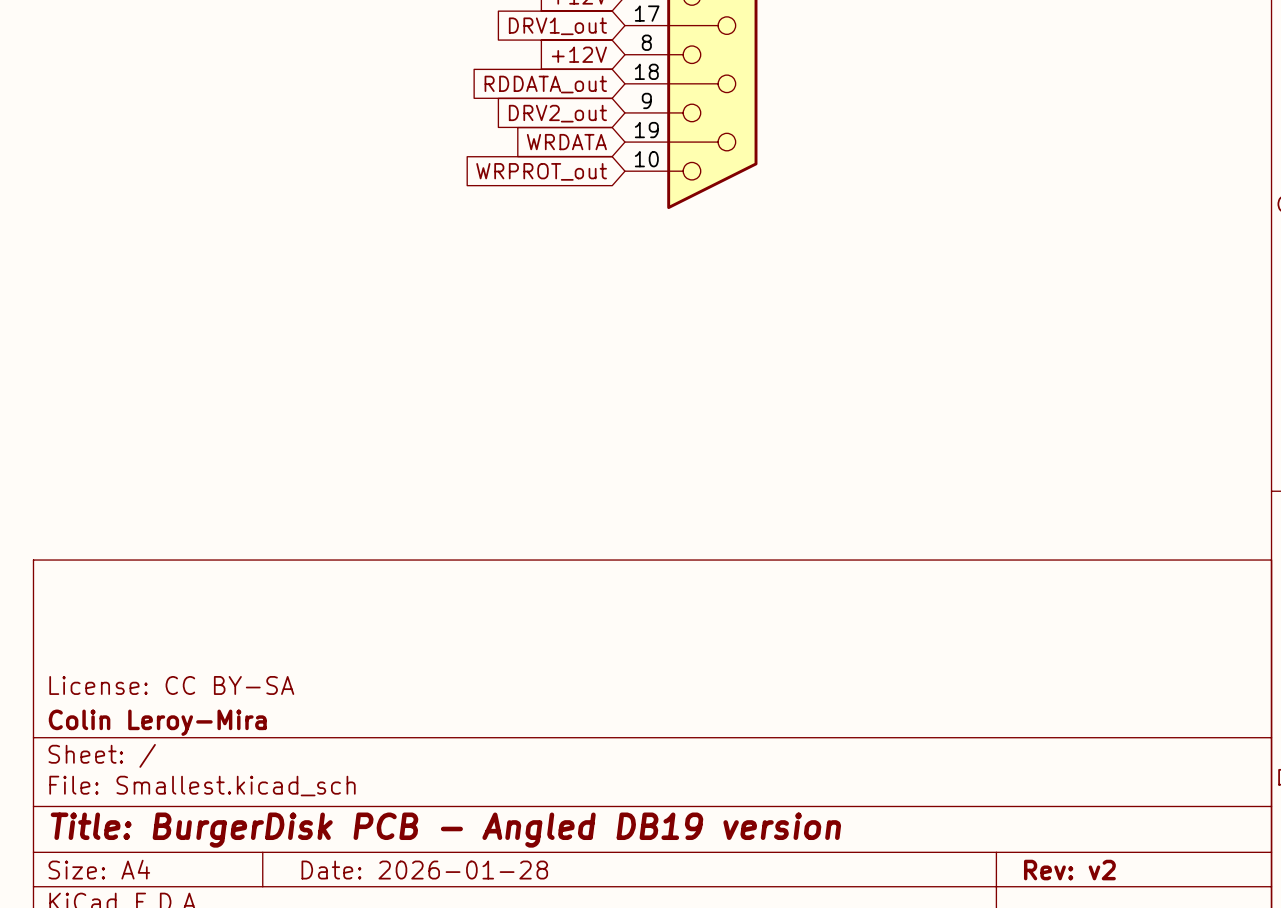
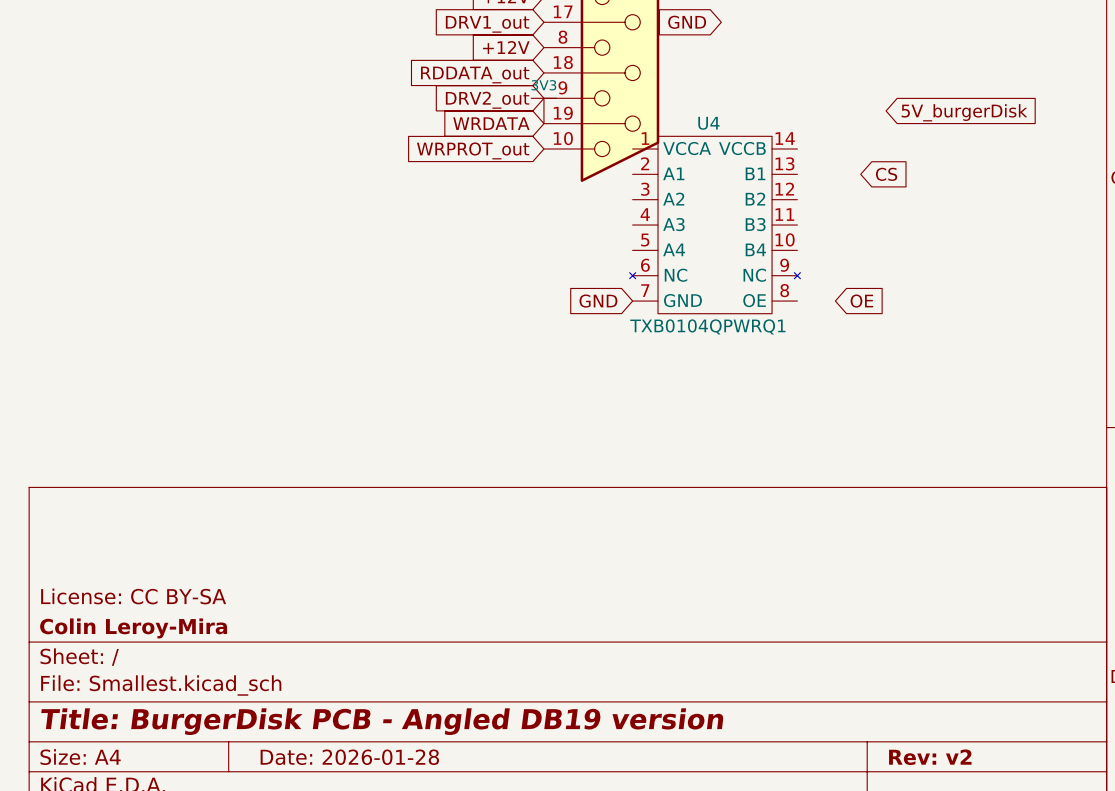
global label: none -> GND (687, 22)
power symbol: none -> 3V3 (543, 110)
global label: none -> 5V_burgerDisk (964, 112)
global label: none -> CS (886, 174)
U4: none -> TXB0104QPWRQ1 (715, 225)
global label: none -> GND (598, 301)
global label: none -> OE (861, 301)

